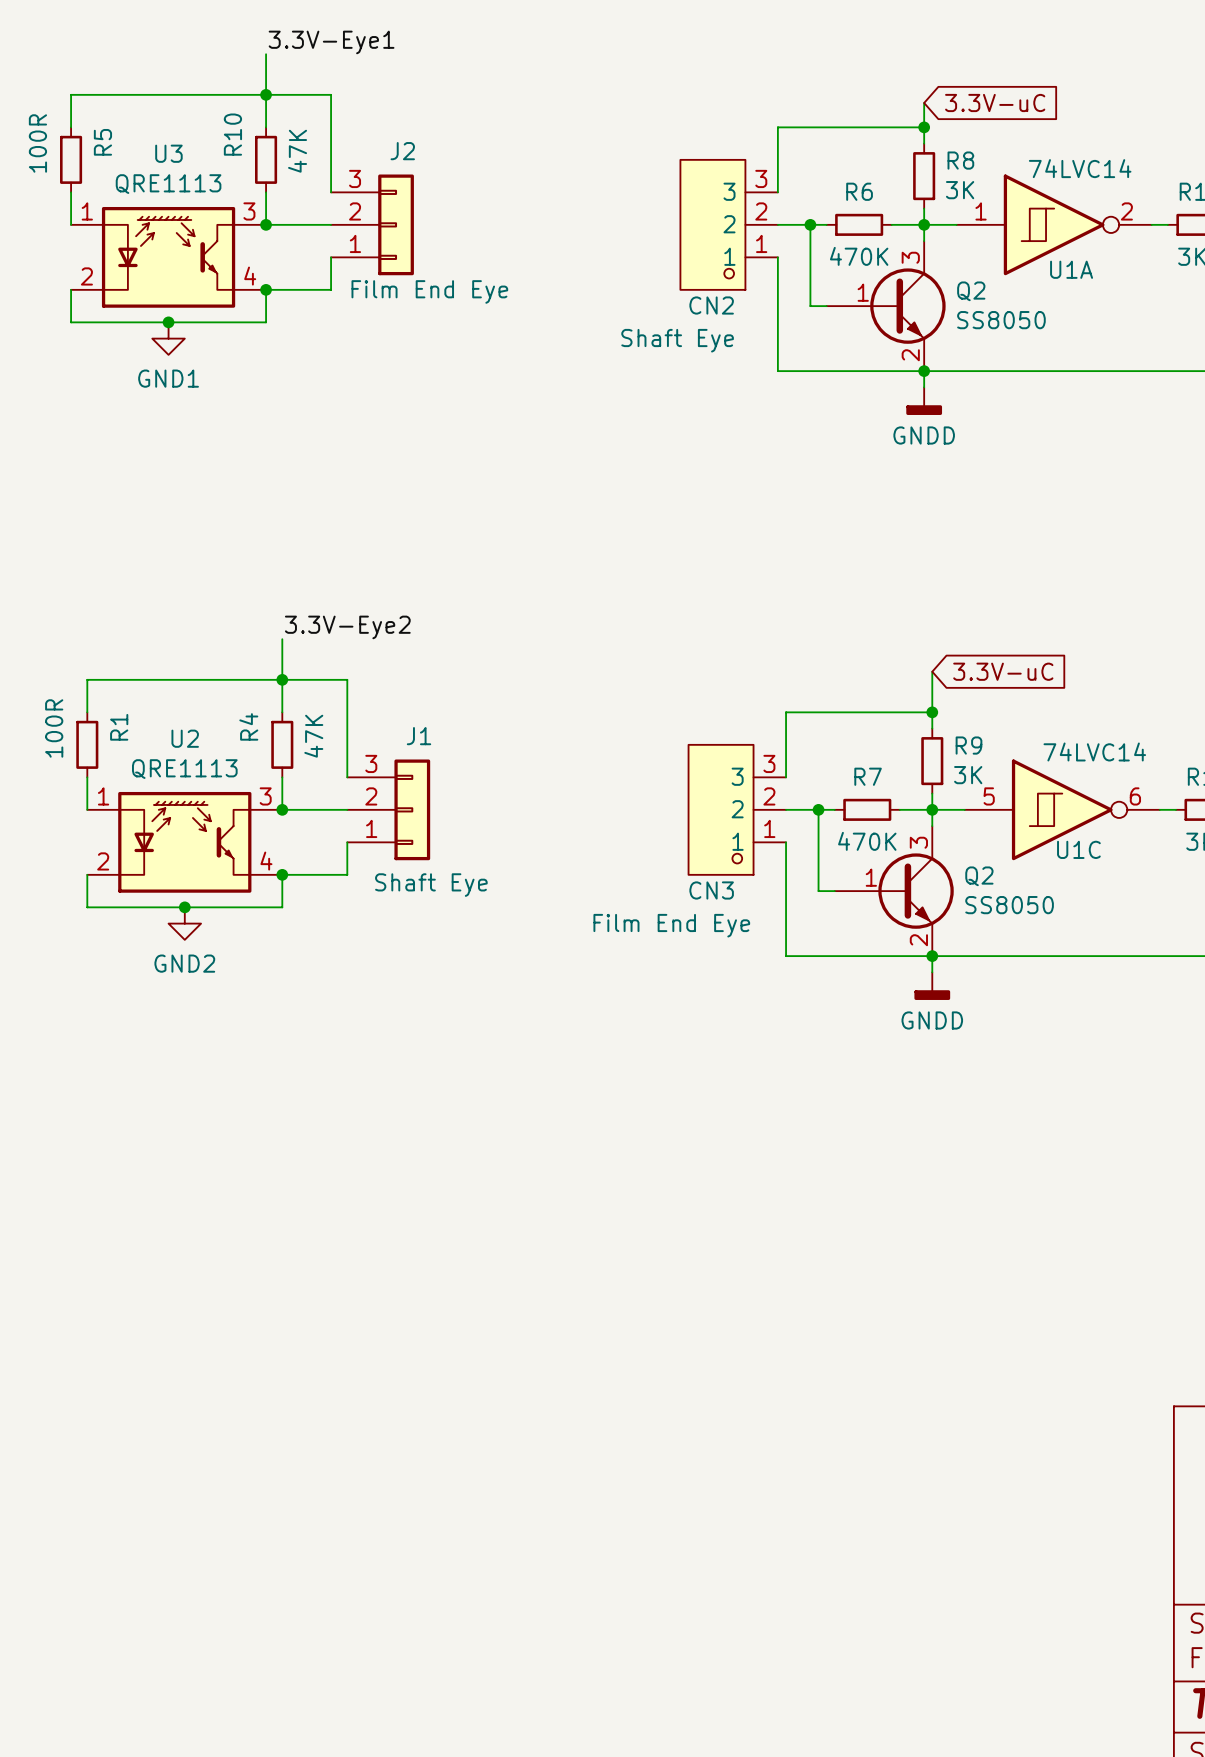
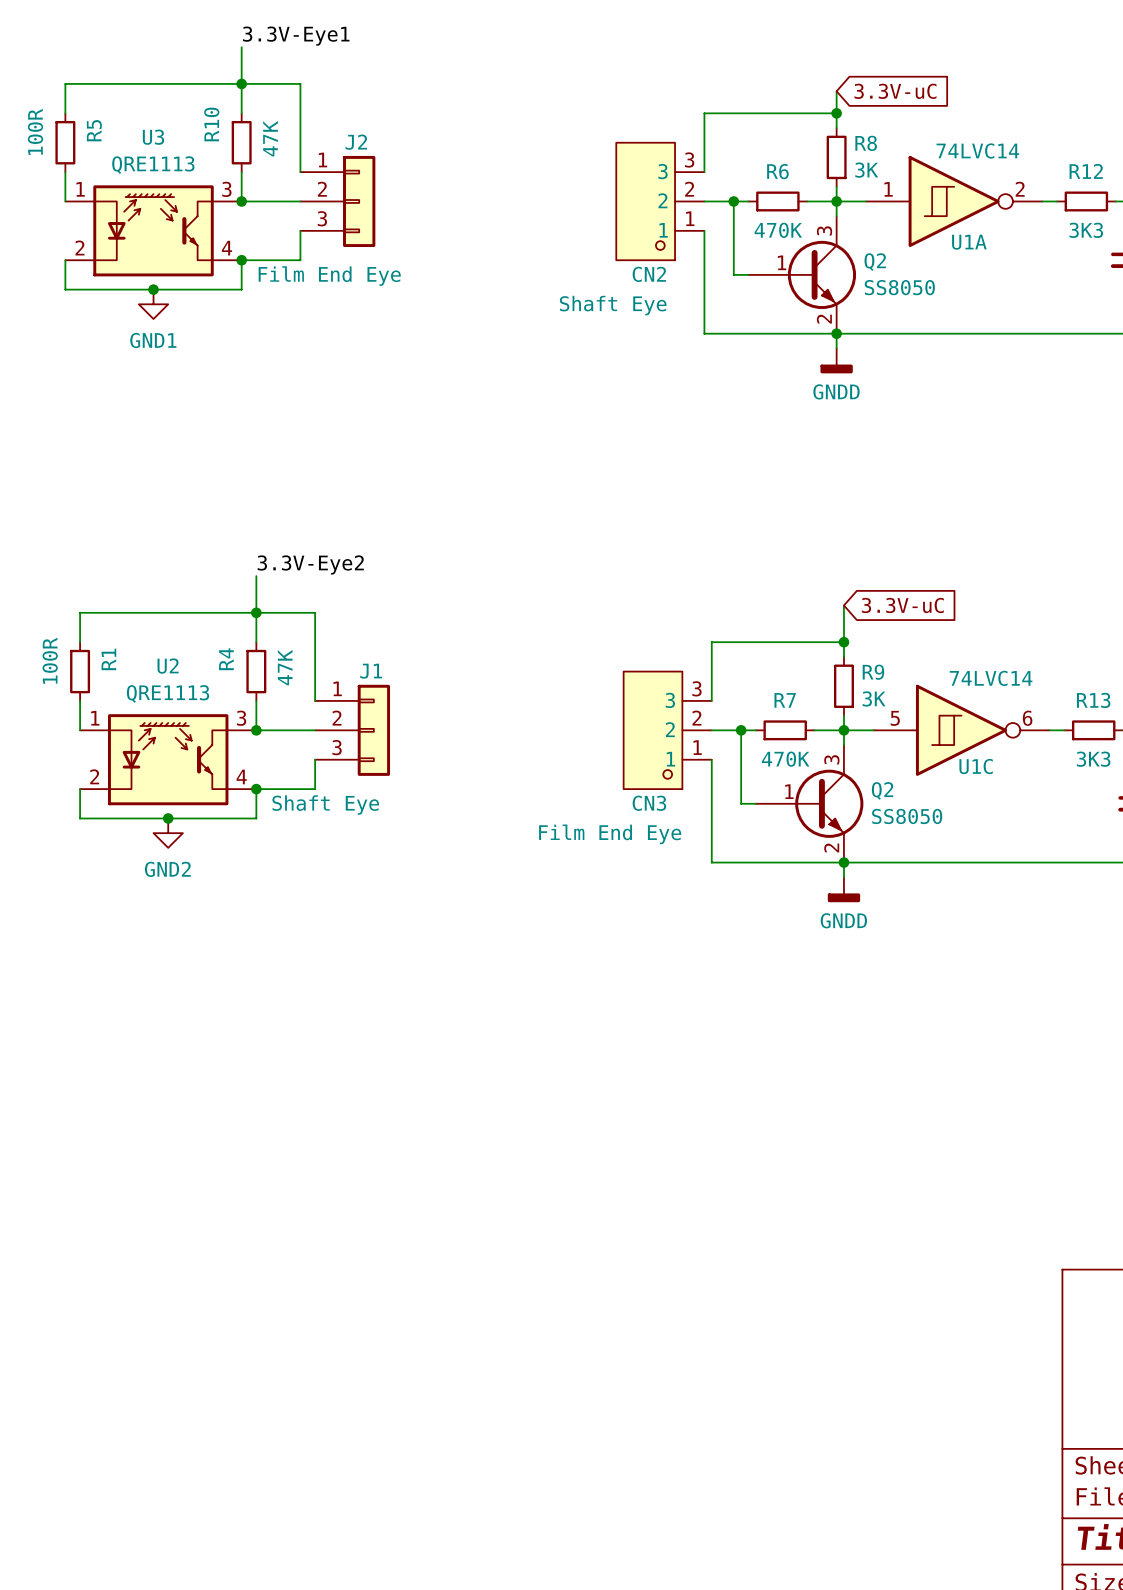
J2 flip: as is (396, 224) -> up-down (359, 201)
J2 value position: Film End Eye (429, 291) -> Film End Eye (329, 276)
J1 flip: as is (412, 809) -> up-down (373, 730)
J1 value position: Shaft Eye (431, 885) -> Shaft Eye (325, 805)

